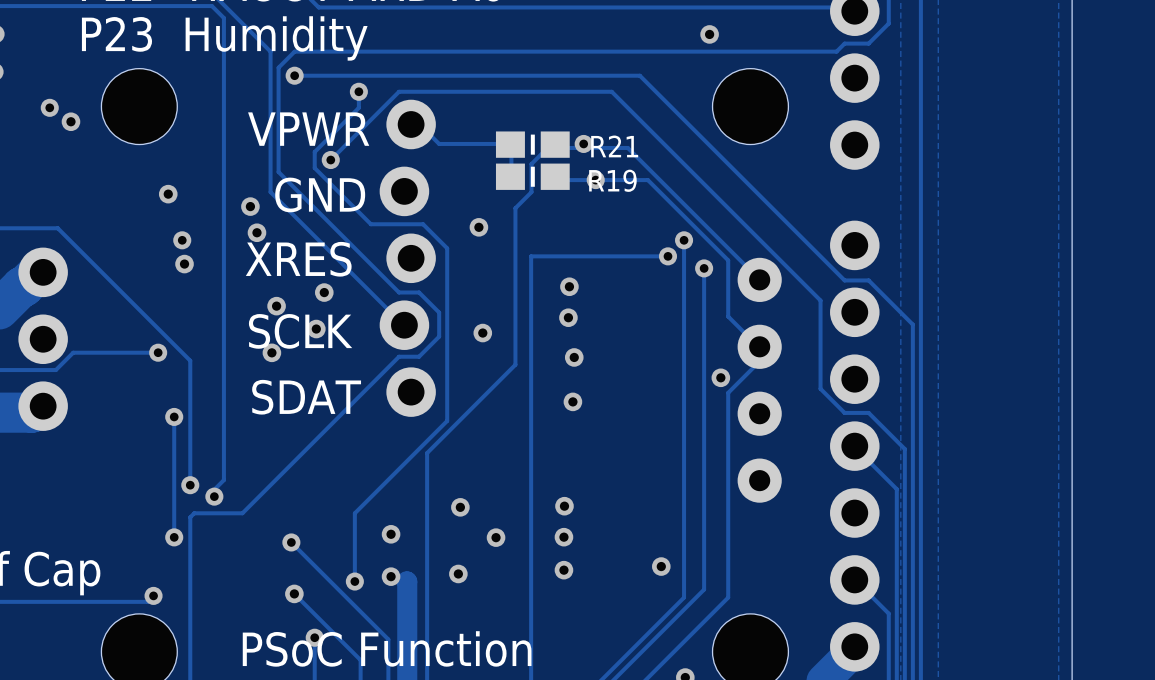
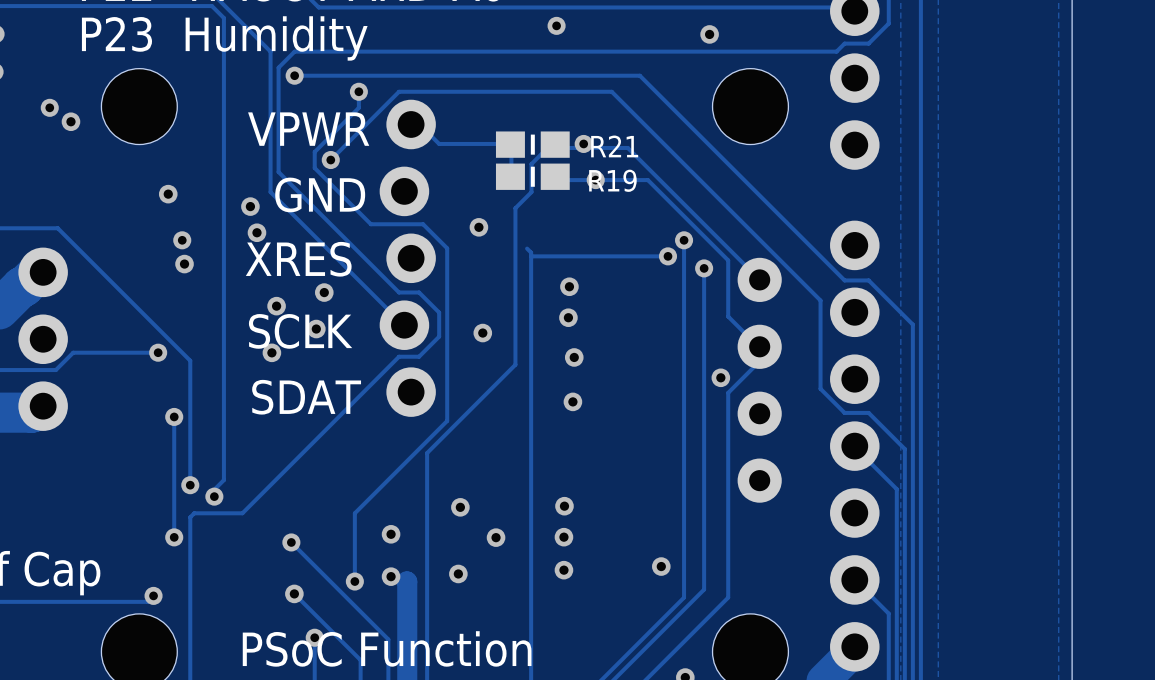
via: none -> (556, 25)
track: none -> (527, 248) (531, 252) (531, 256)

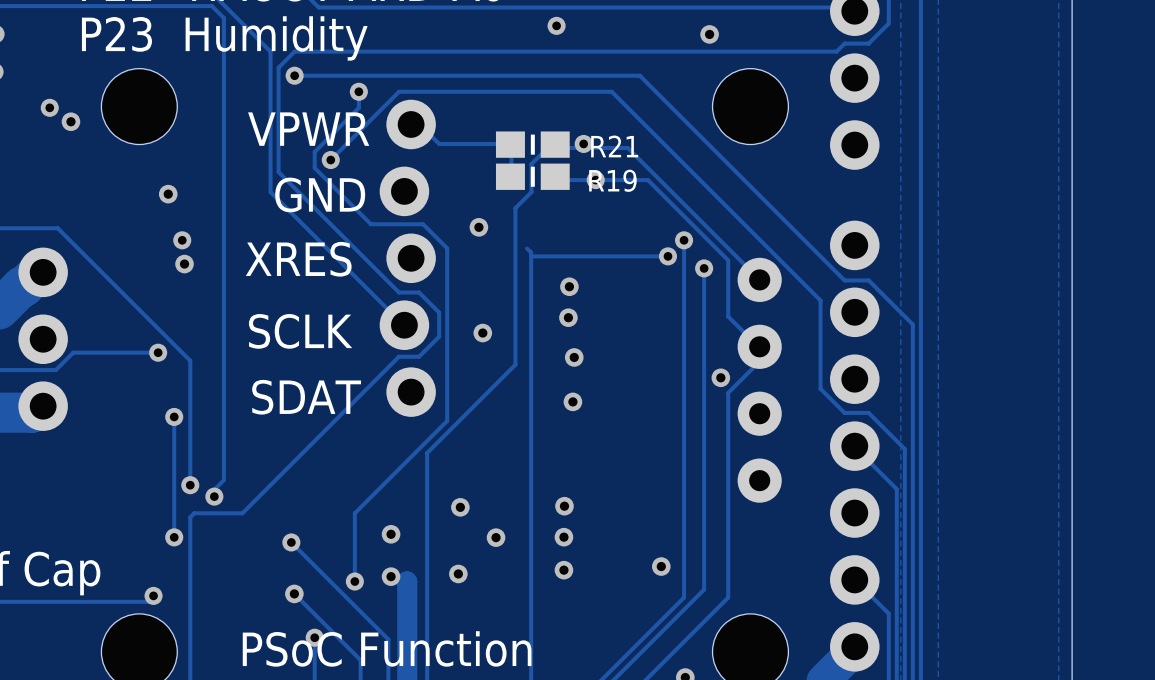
via: (250, 206) -> none
via: (256, 232) -> none
via: (324, 292) -> none
via: (276, 306) -> none
via: (316, 329) -> none
via: (271, 352) -> none

